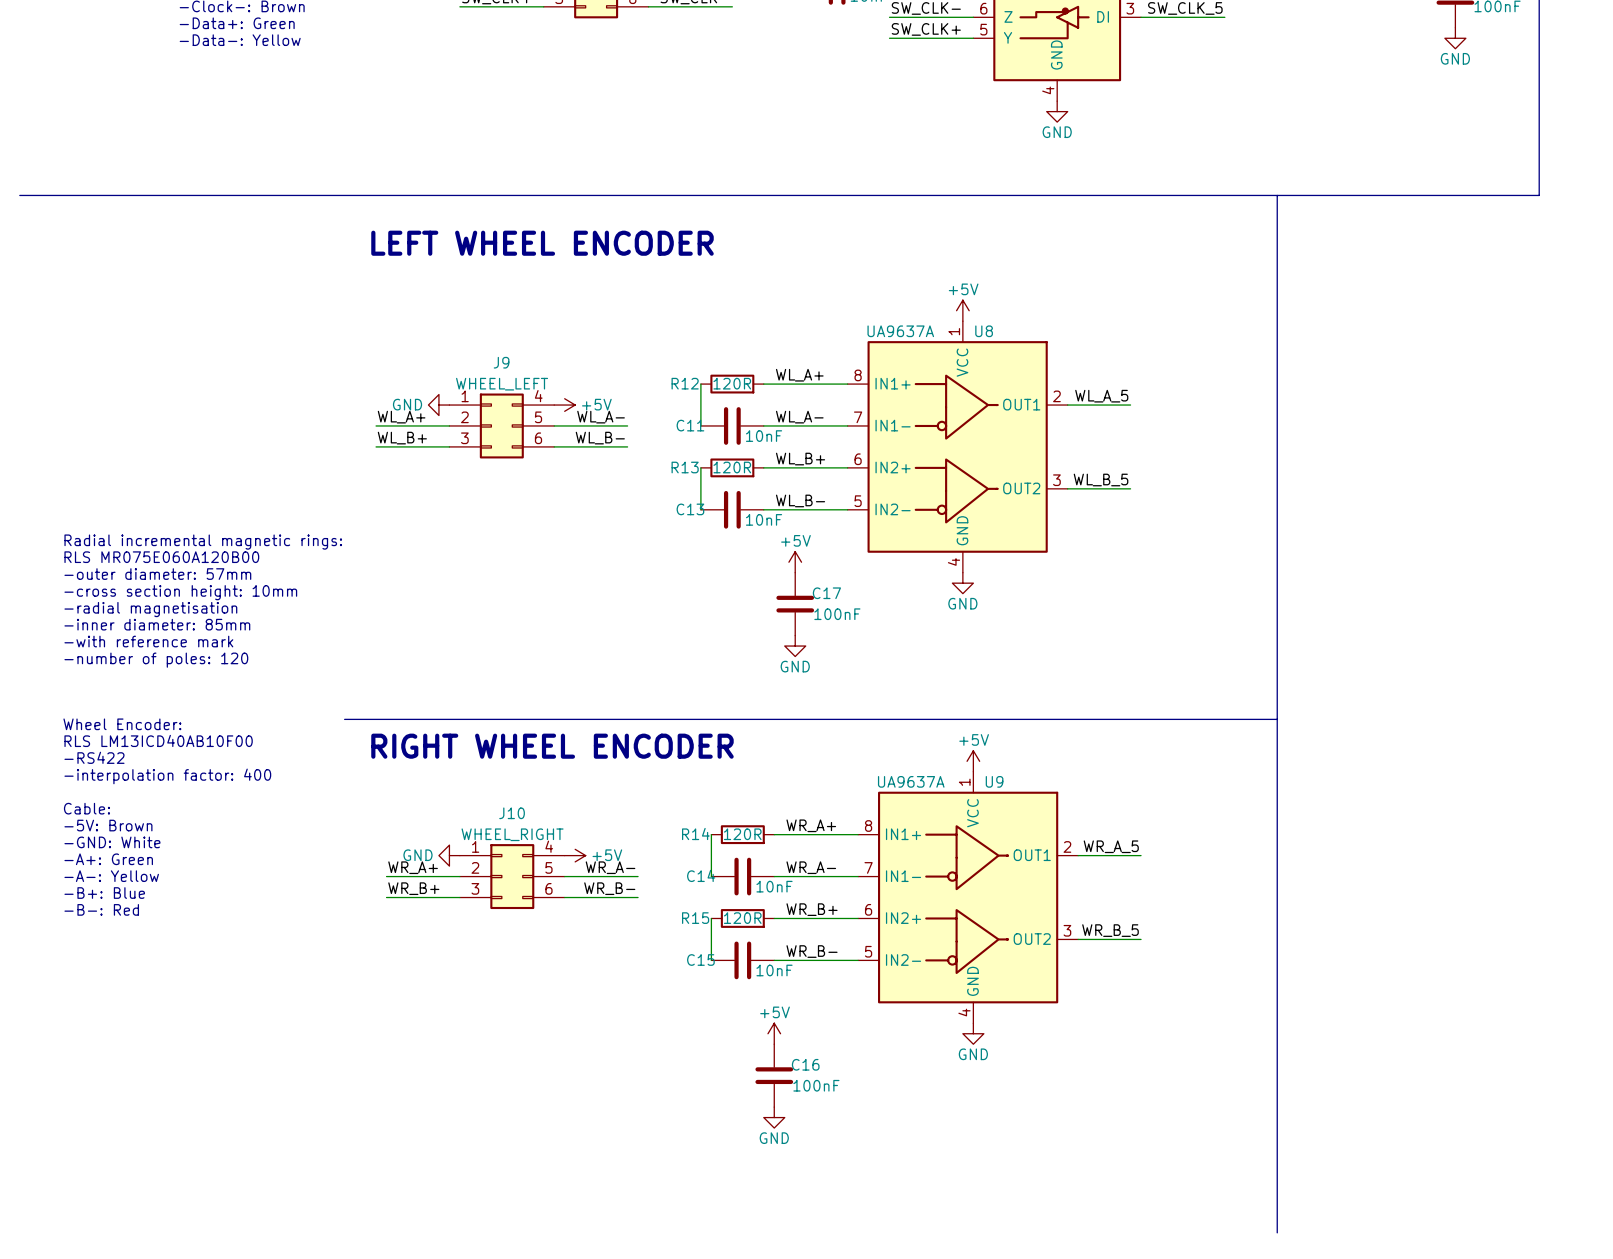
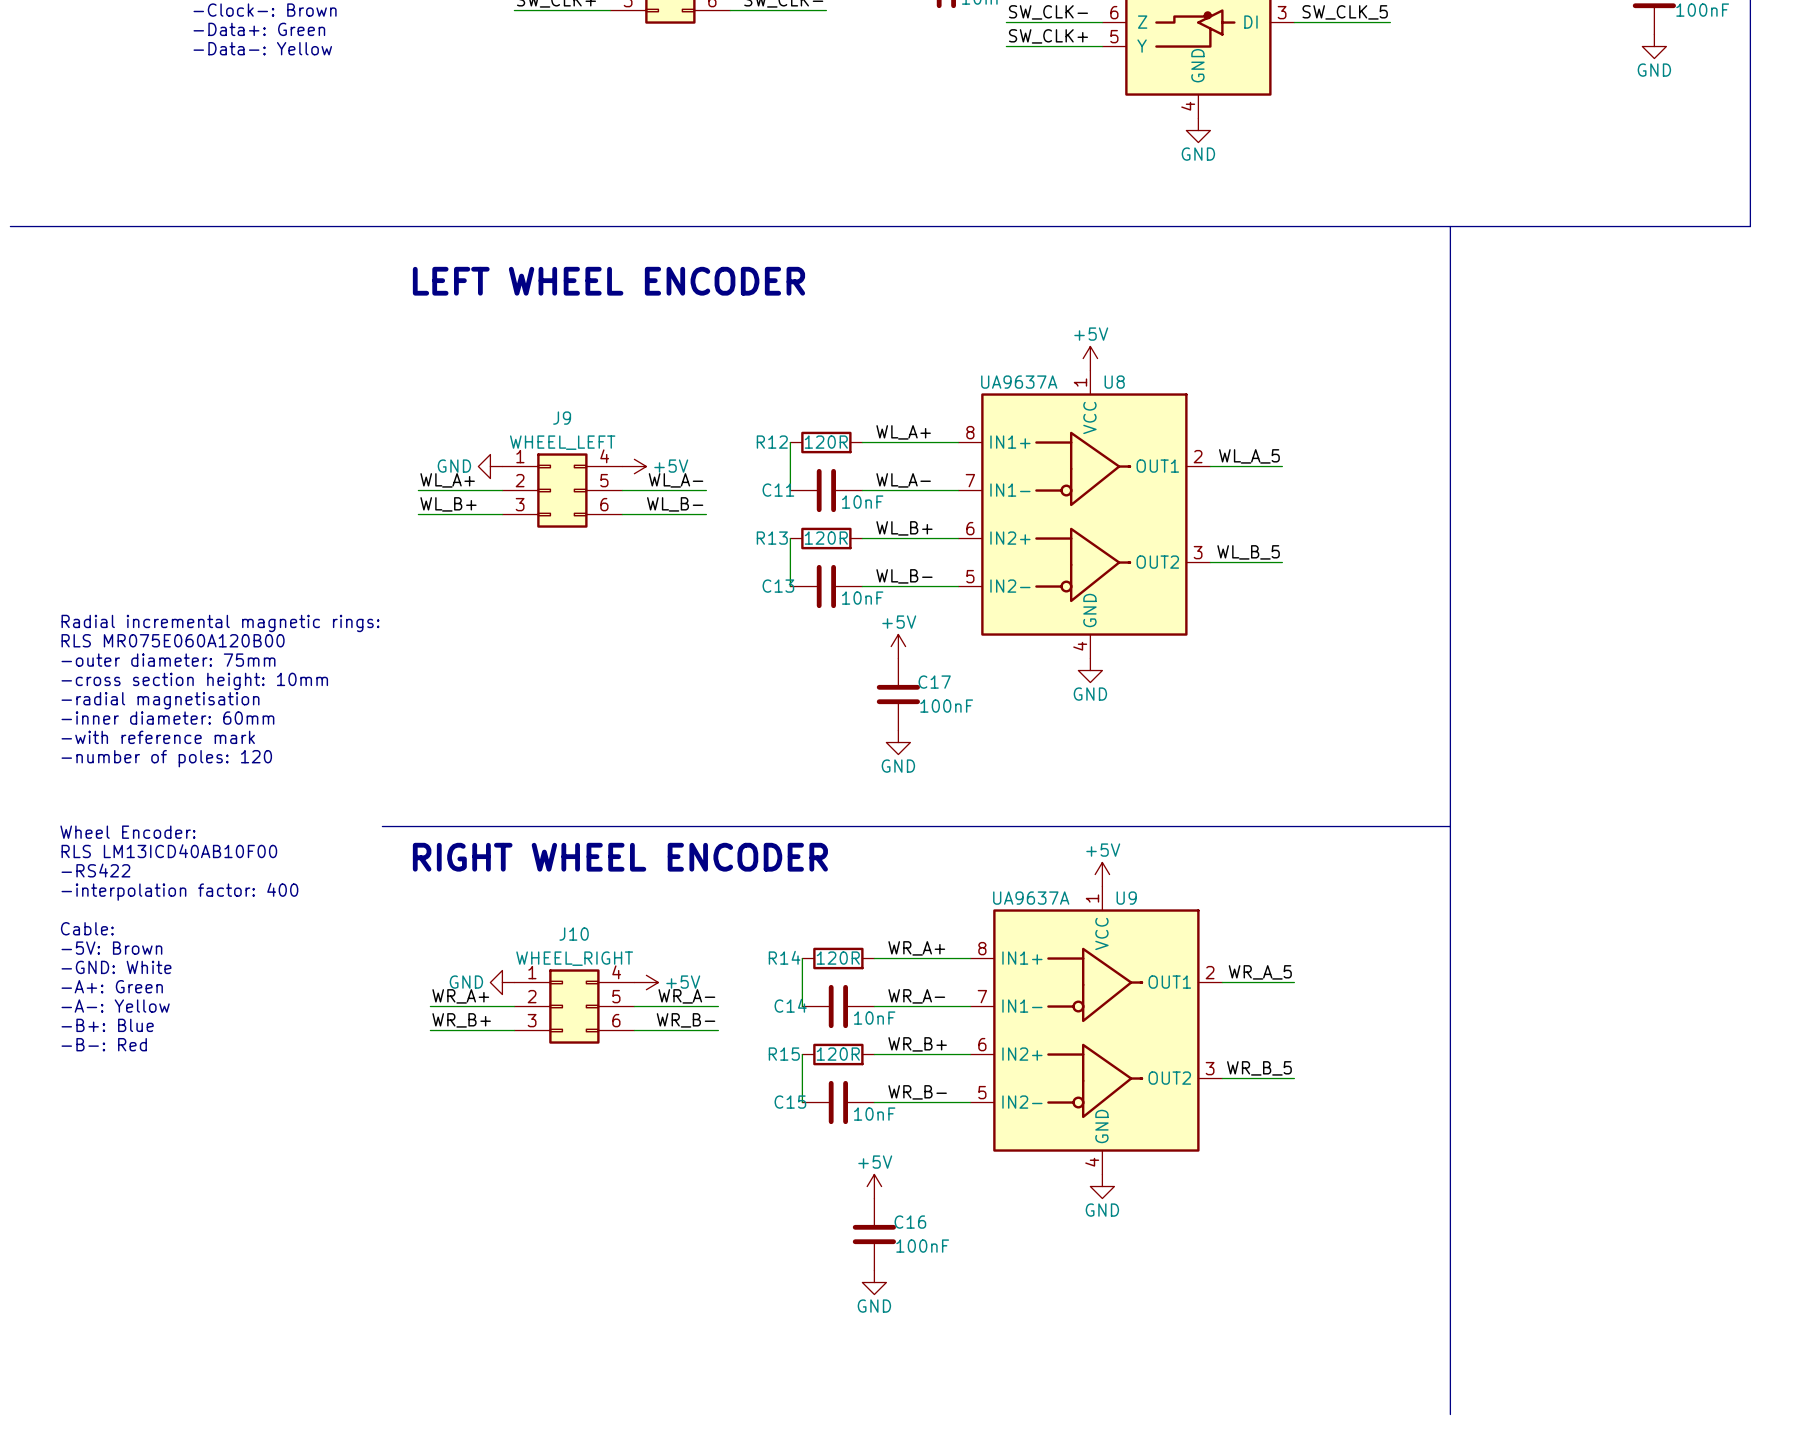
text: -outer diameter: 57mm (157, 574) -> -outer diameter: 75mm (168, 660)
text: -inner diameter: 85mm (157, 624) -> -inner diameter: 60mm (167, 718)

